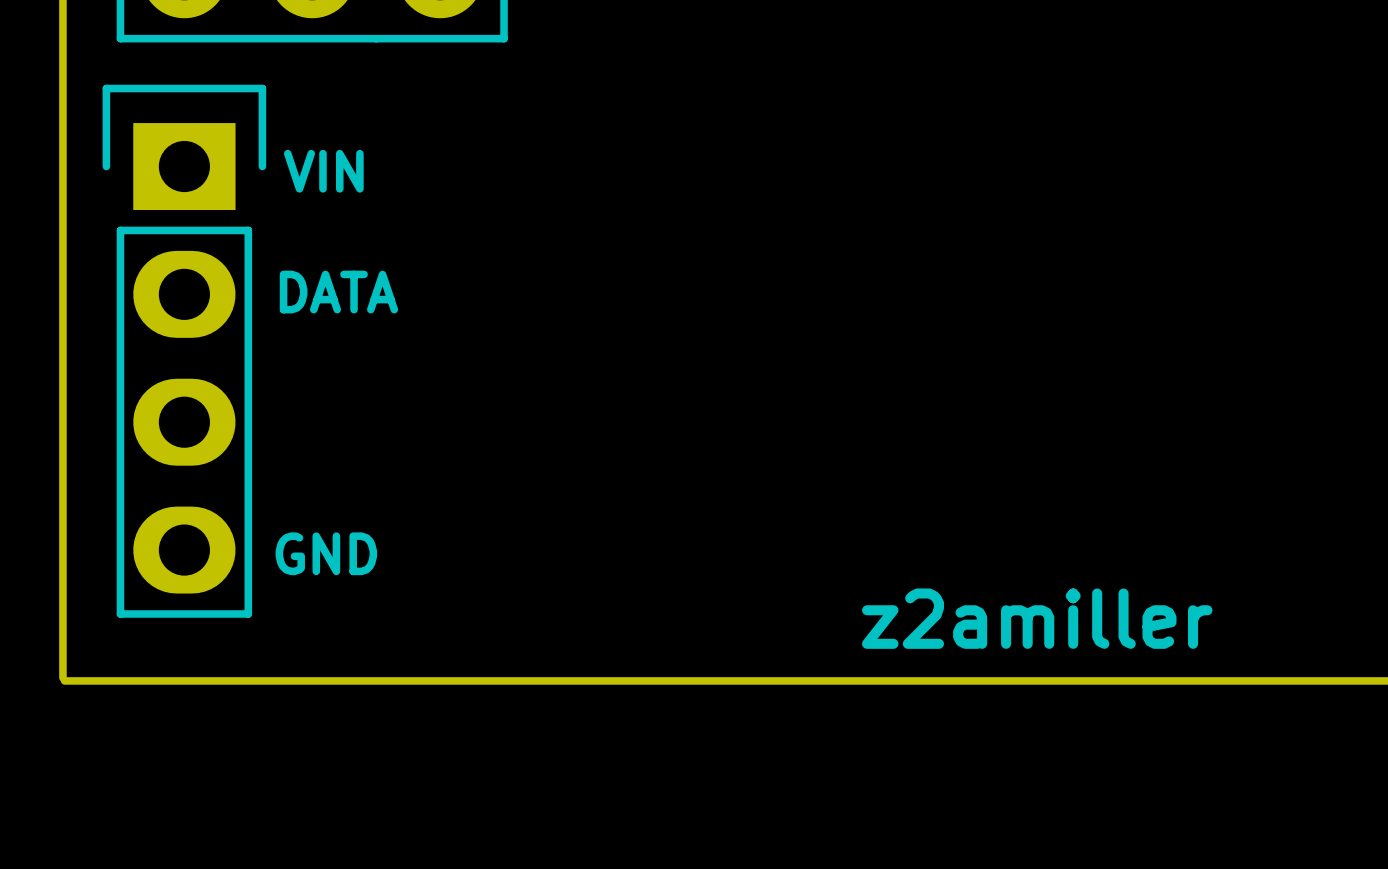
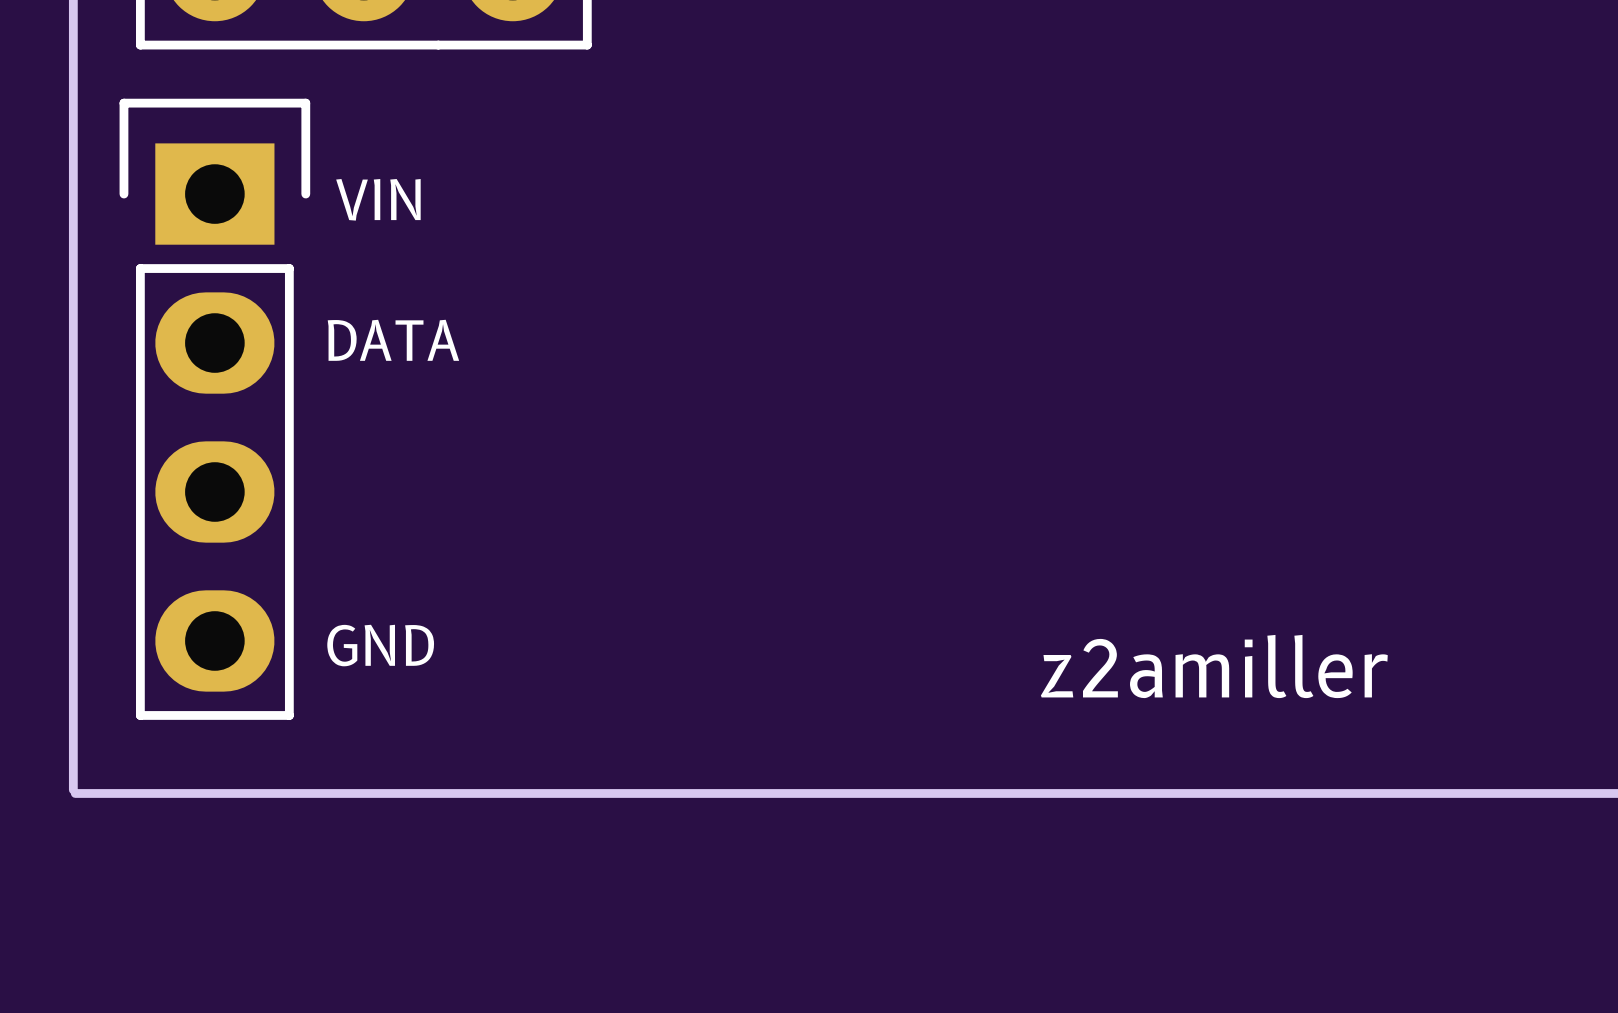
text position: z2amiller (1037, 618) -> z2amiller (1214, 666)

